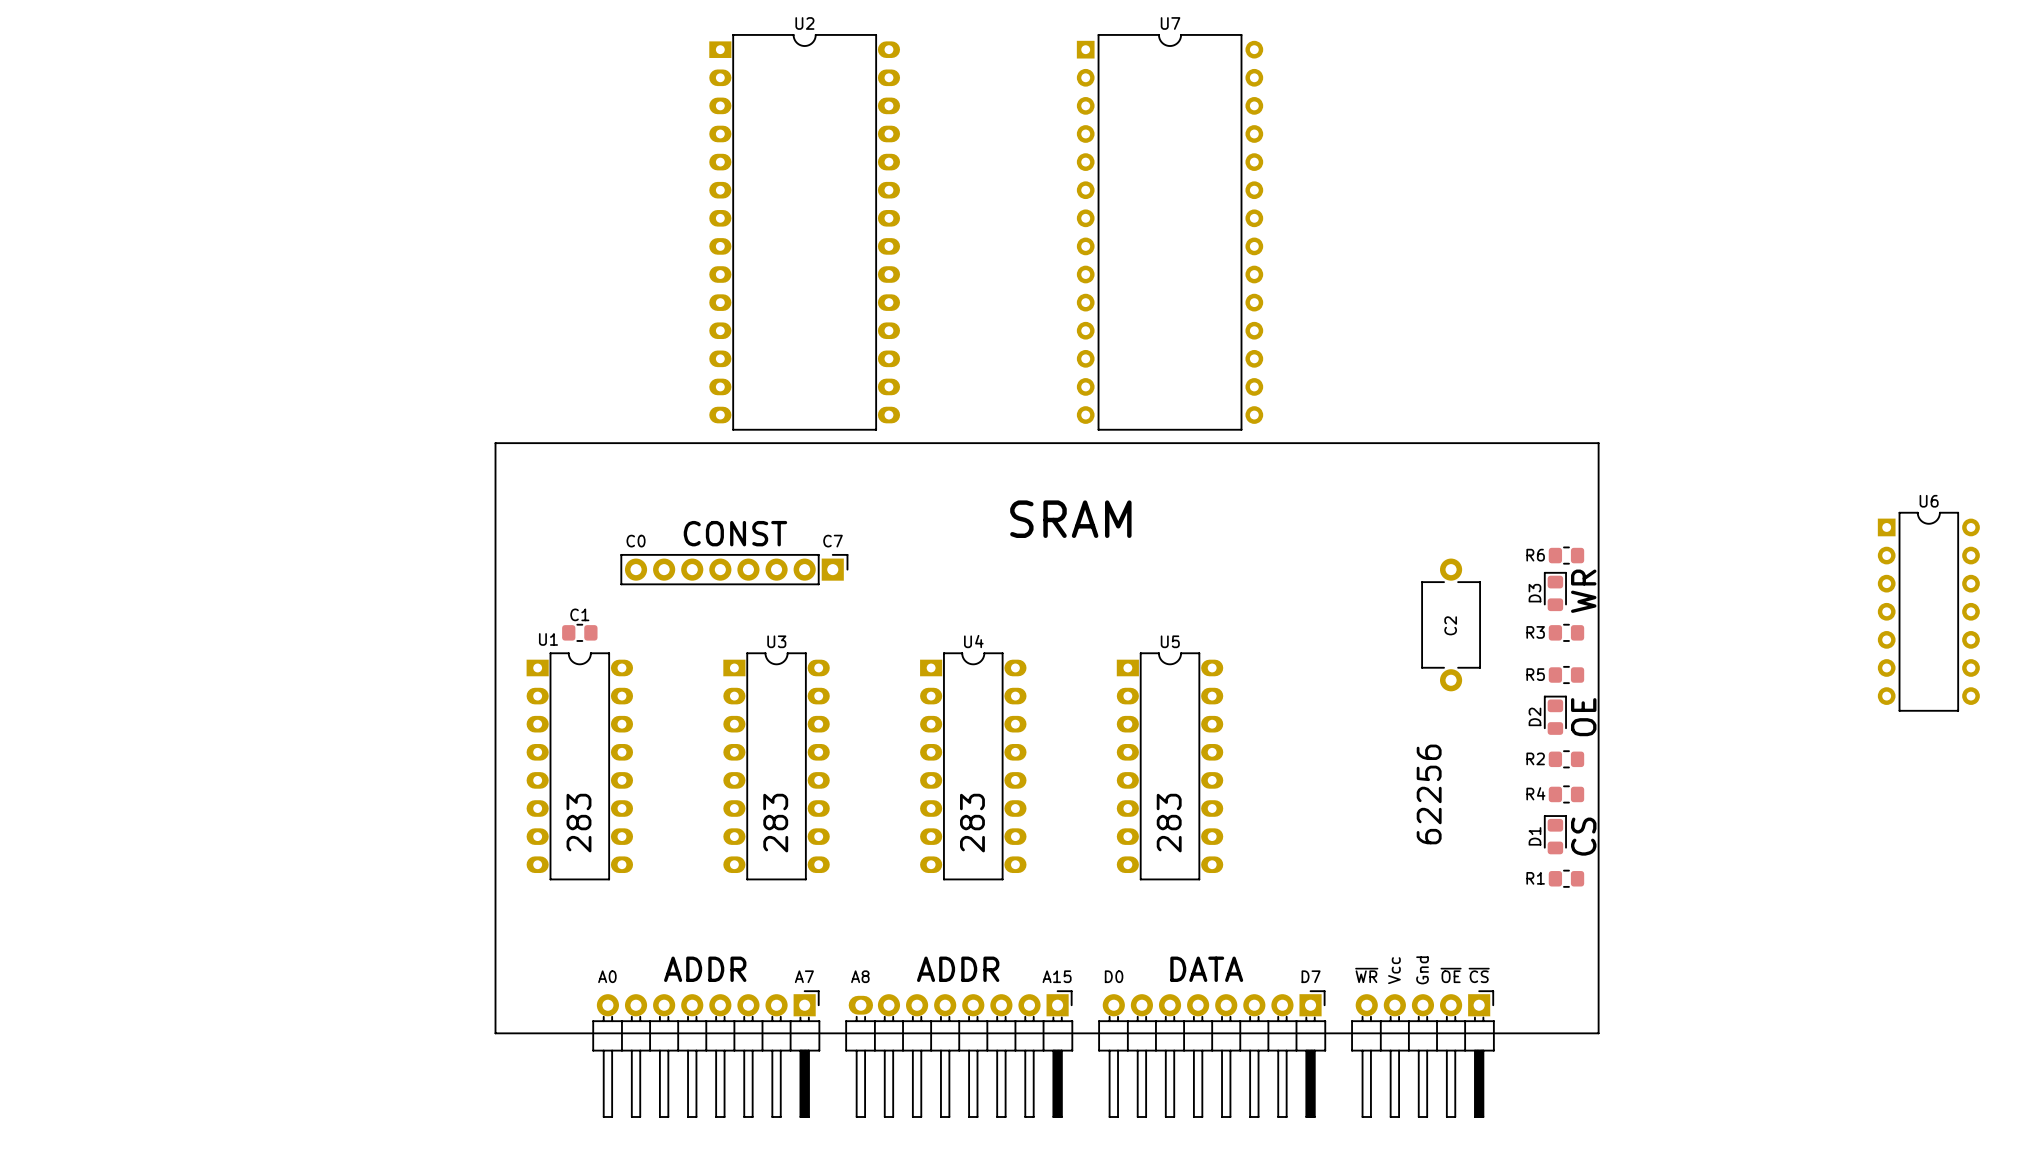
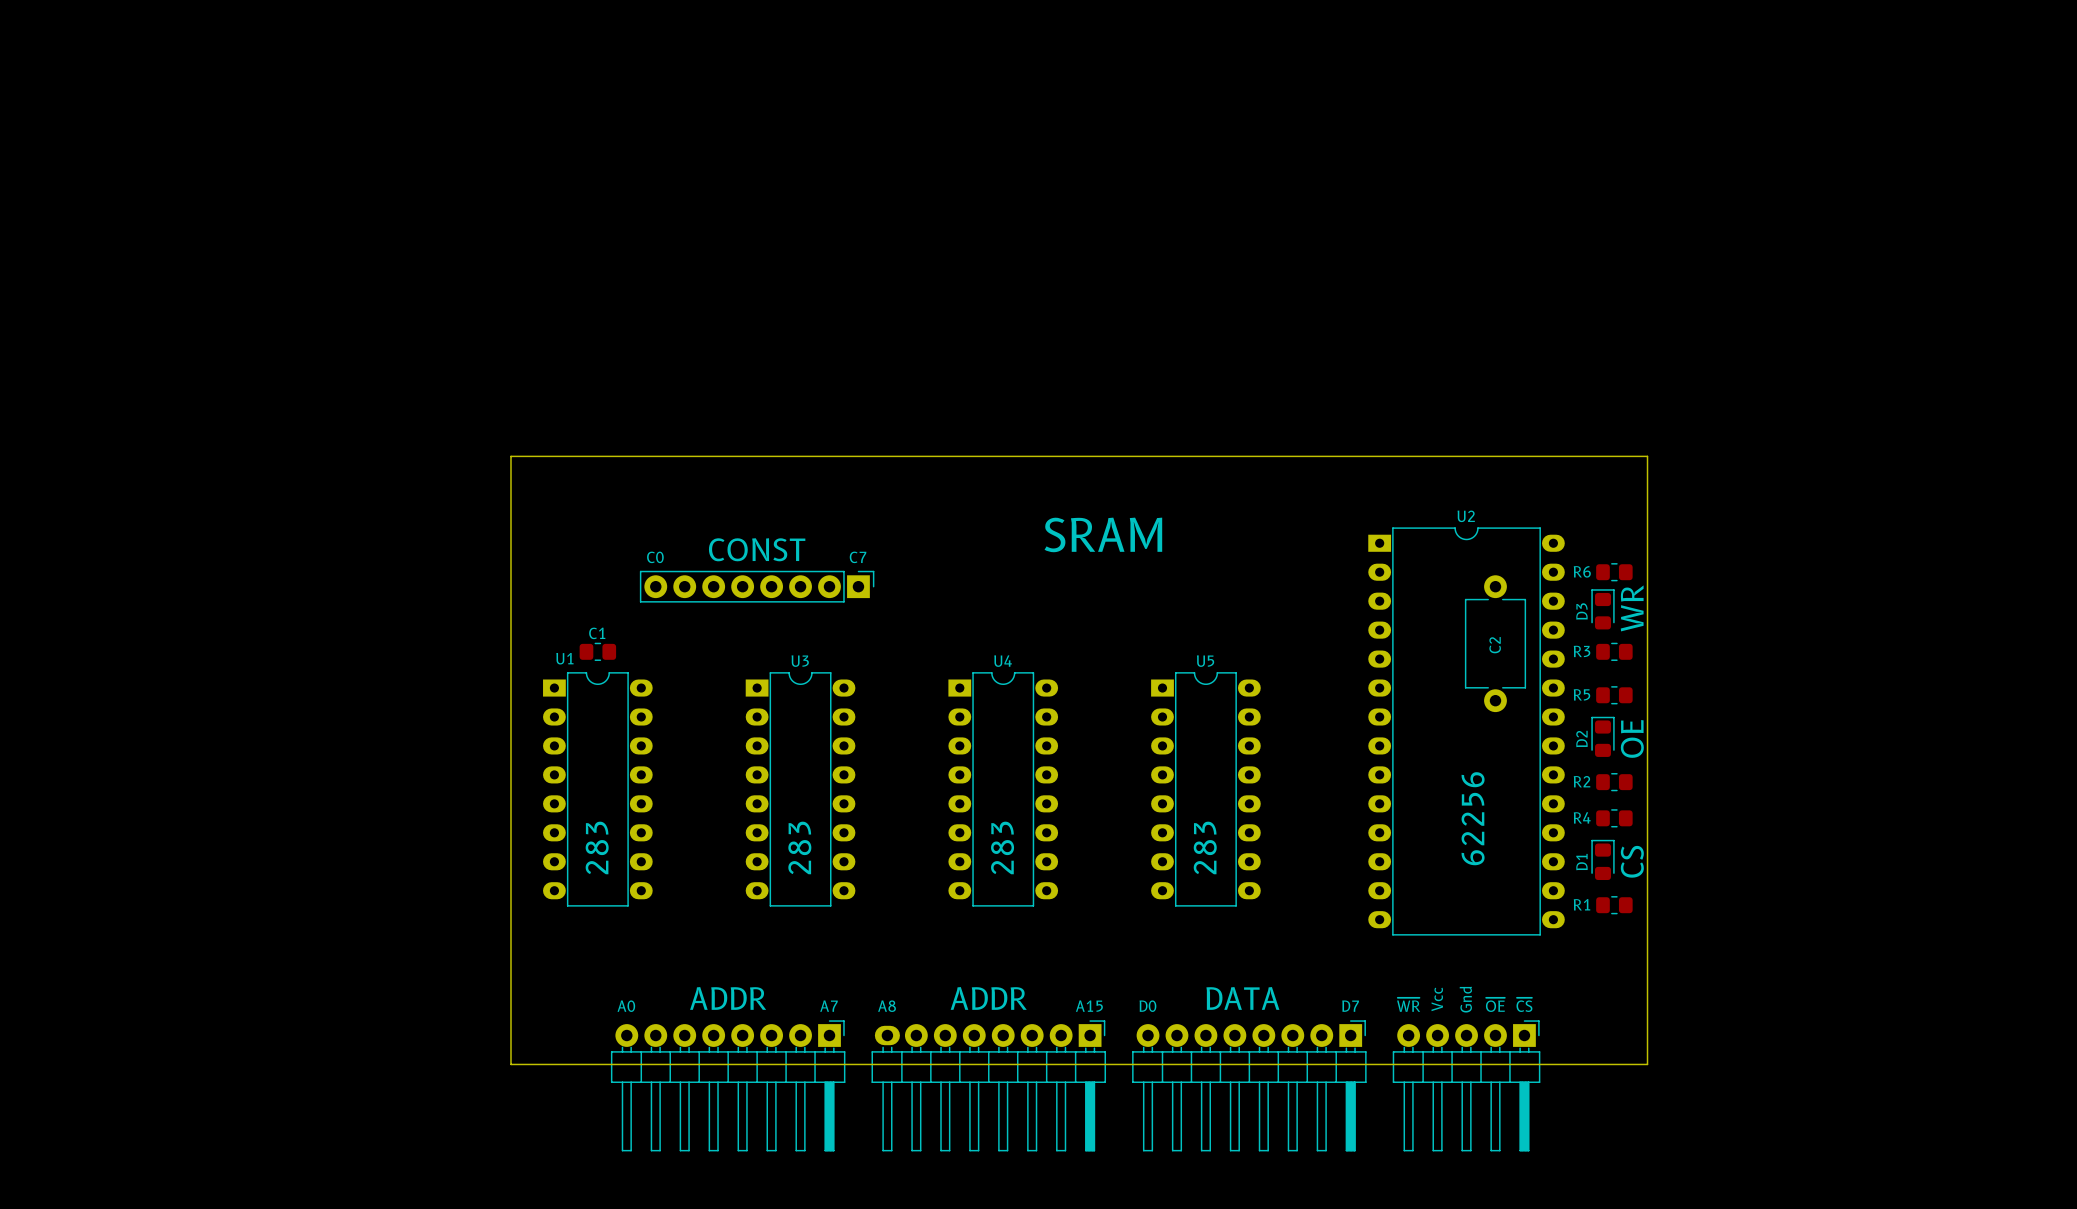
U2 position: (804, 232) -> (1466, 731)
U7: (1170, 232) -> none
U6: (1928, 611) -> none

